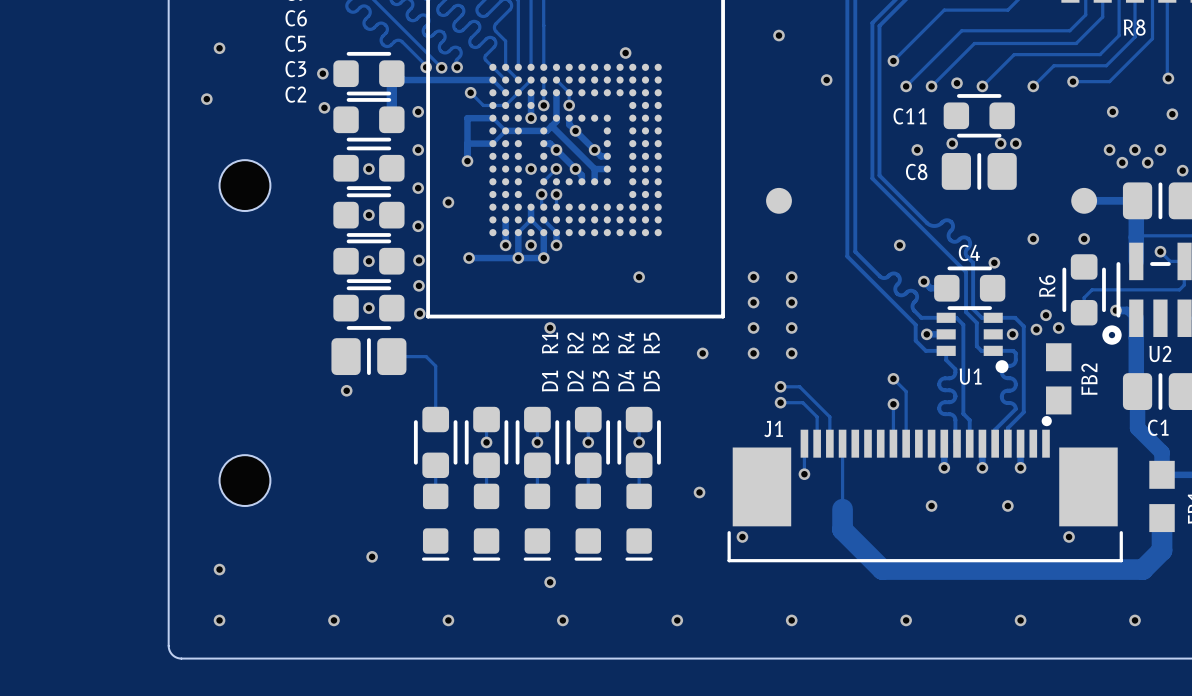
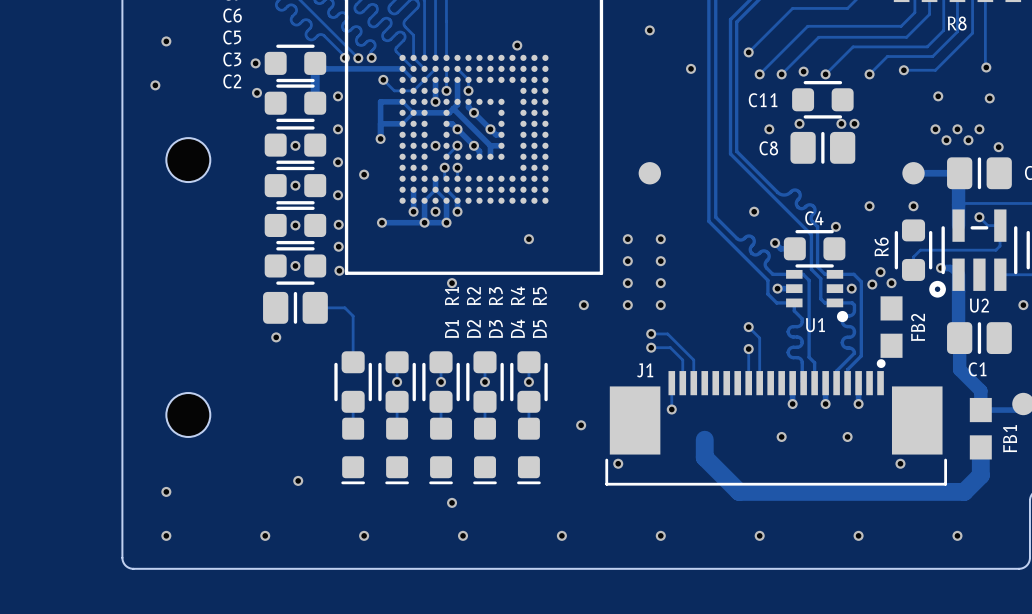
track: (842, 443) (842, 509) -> none

